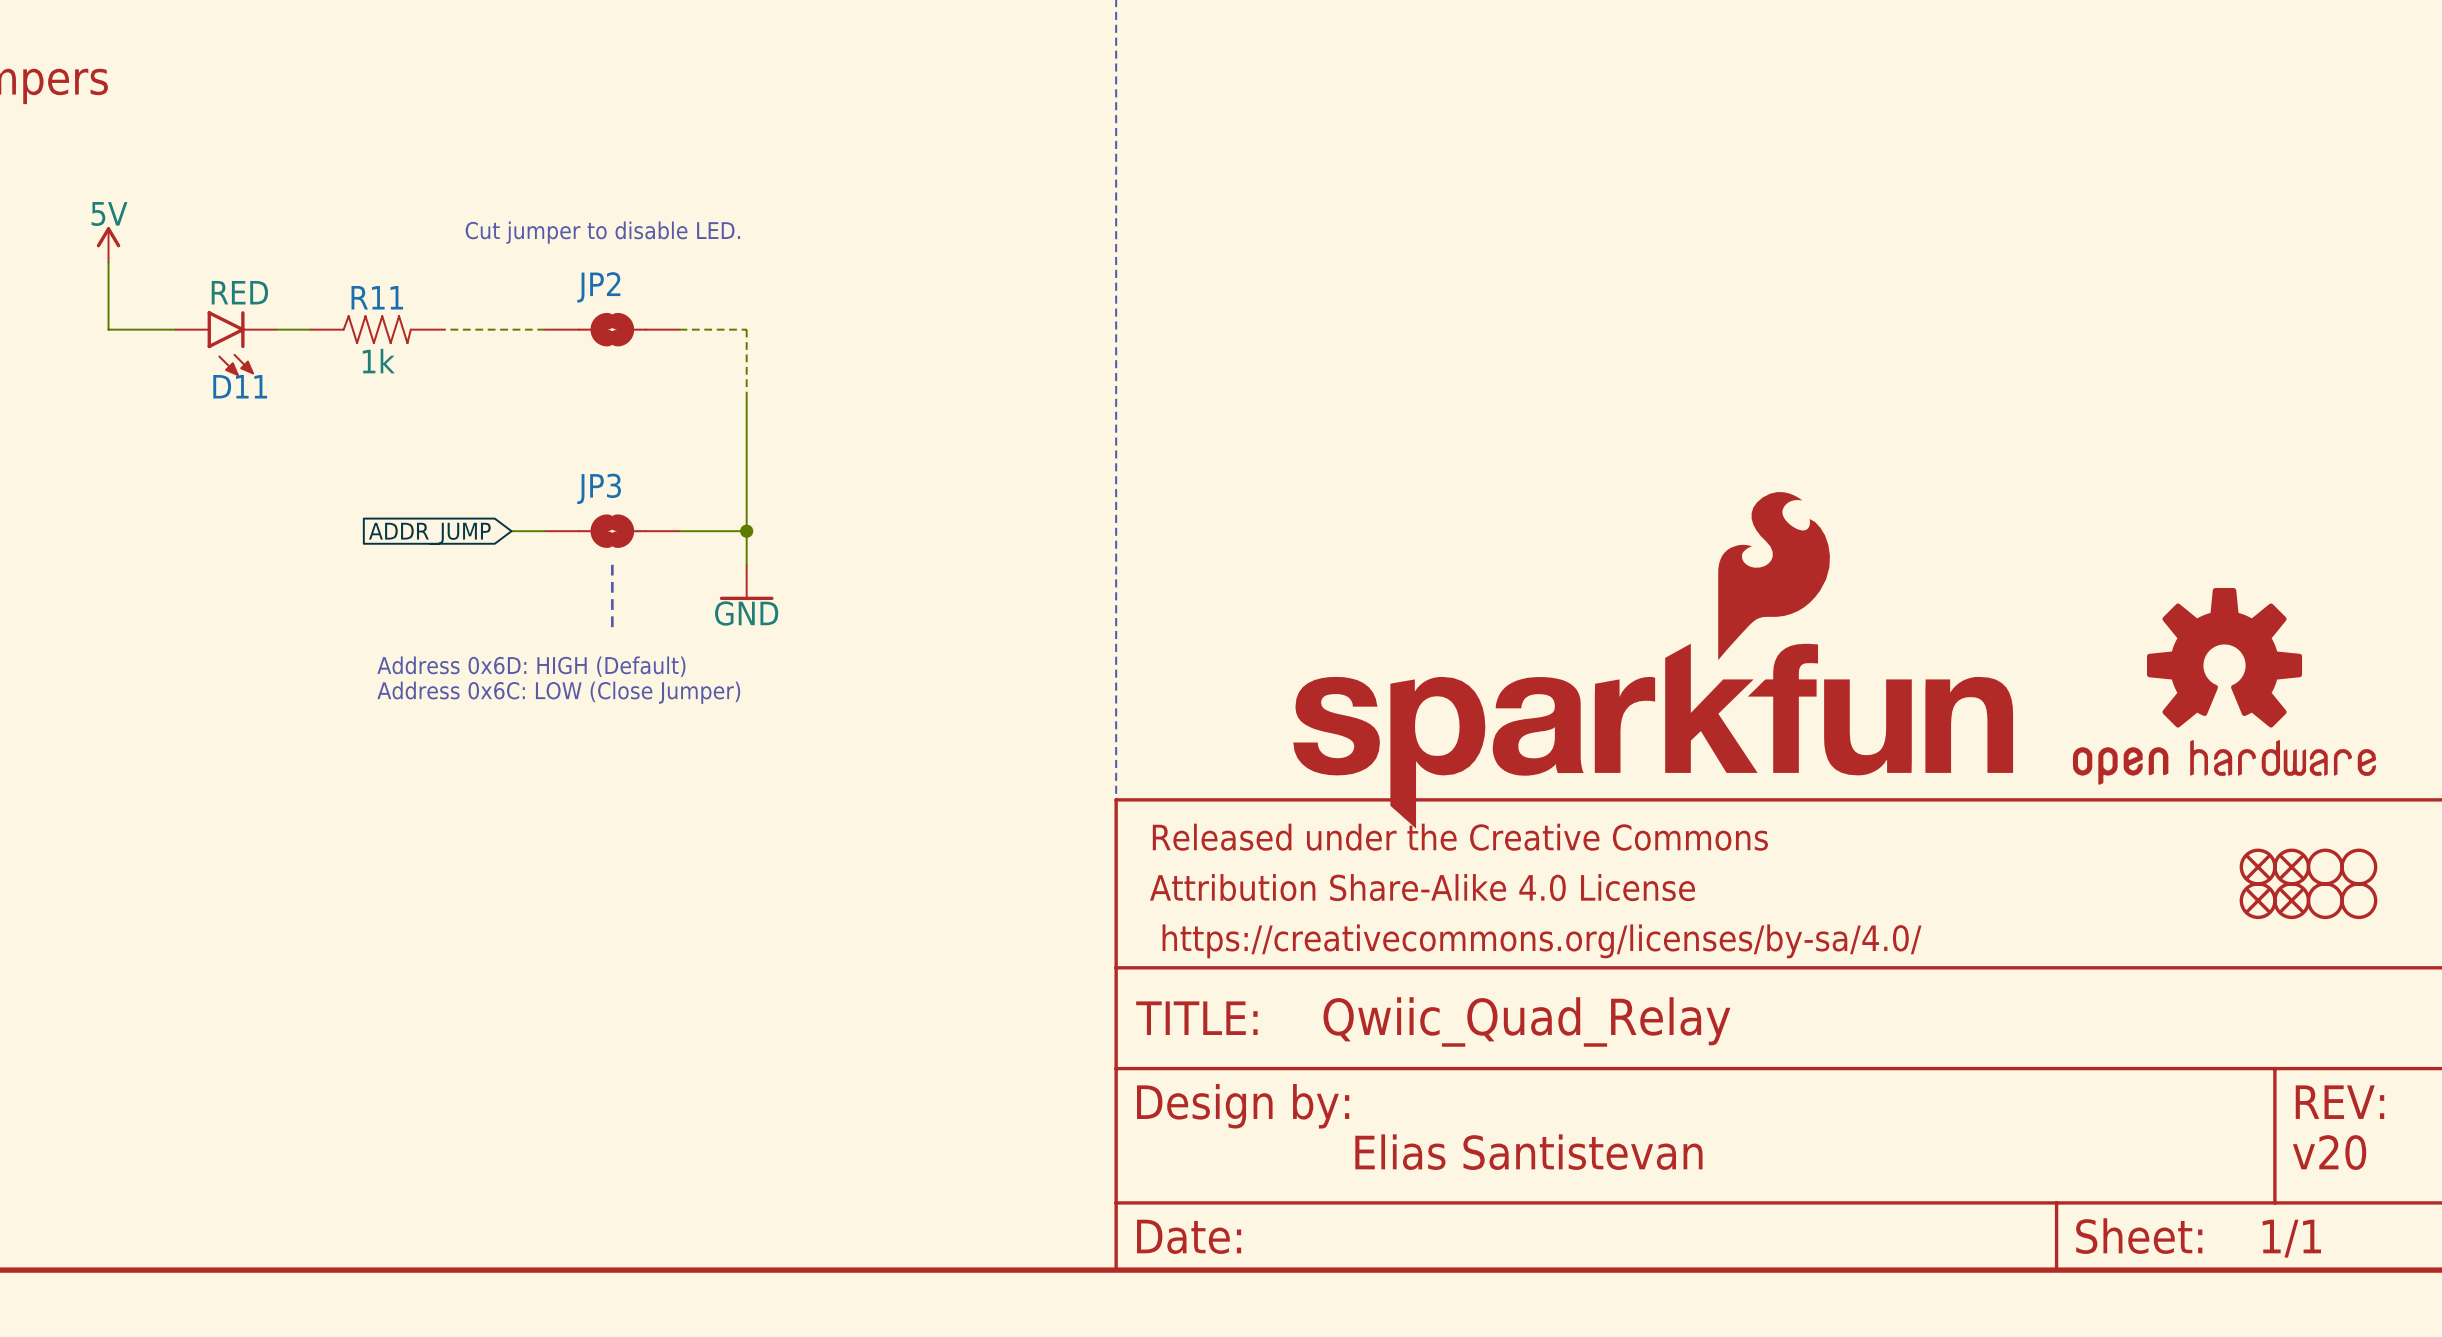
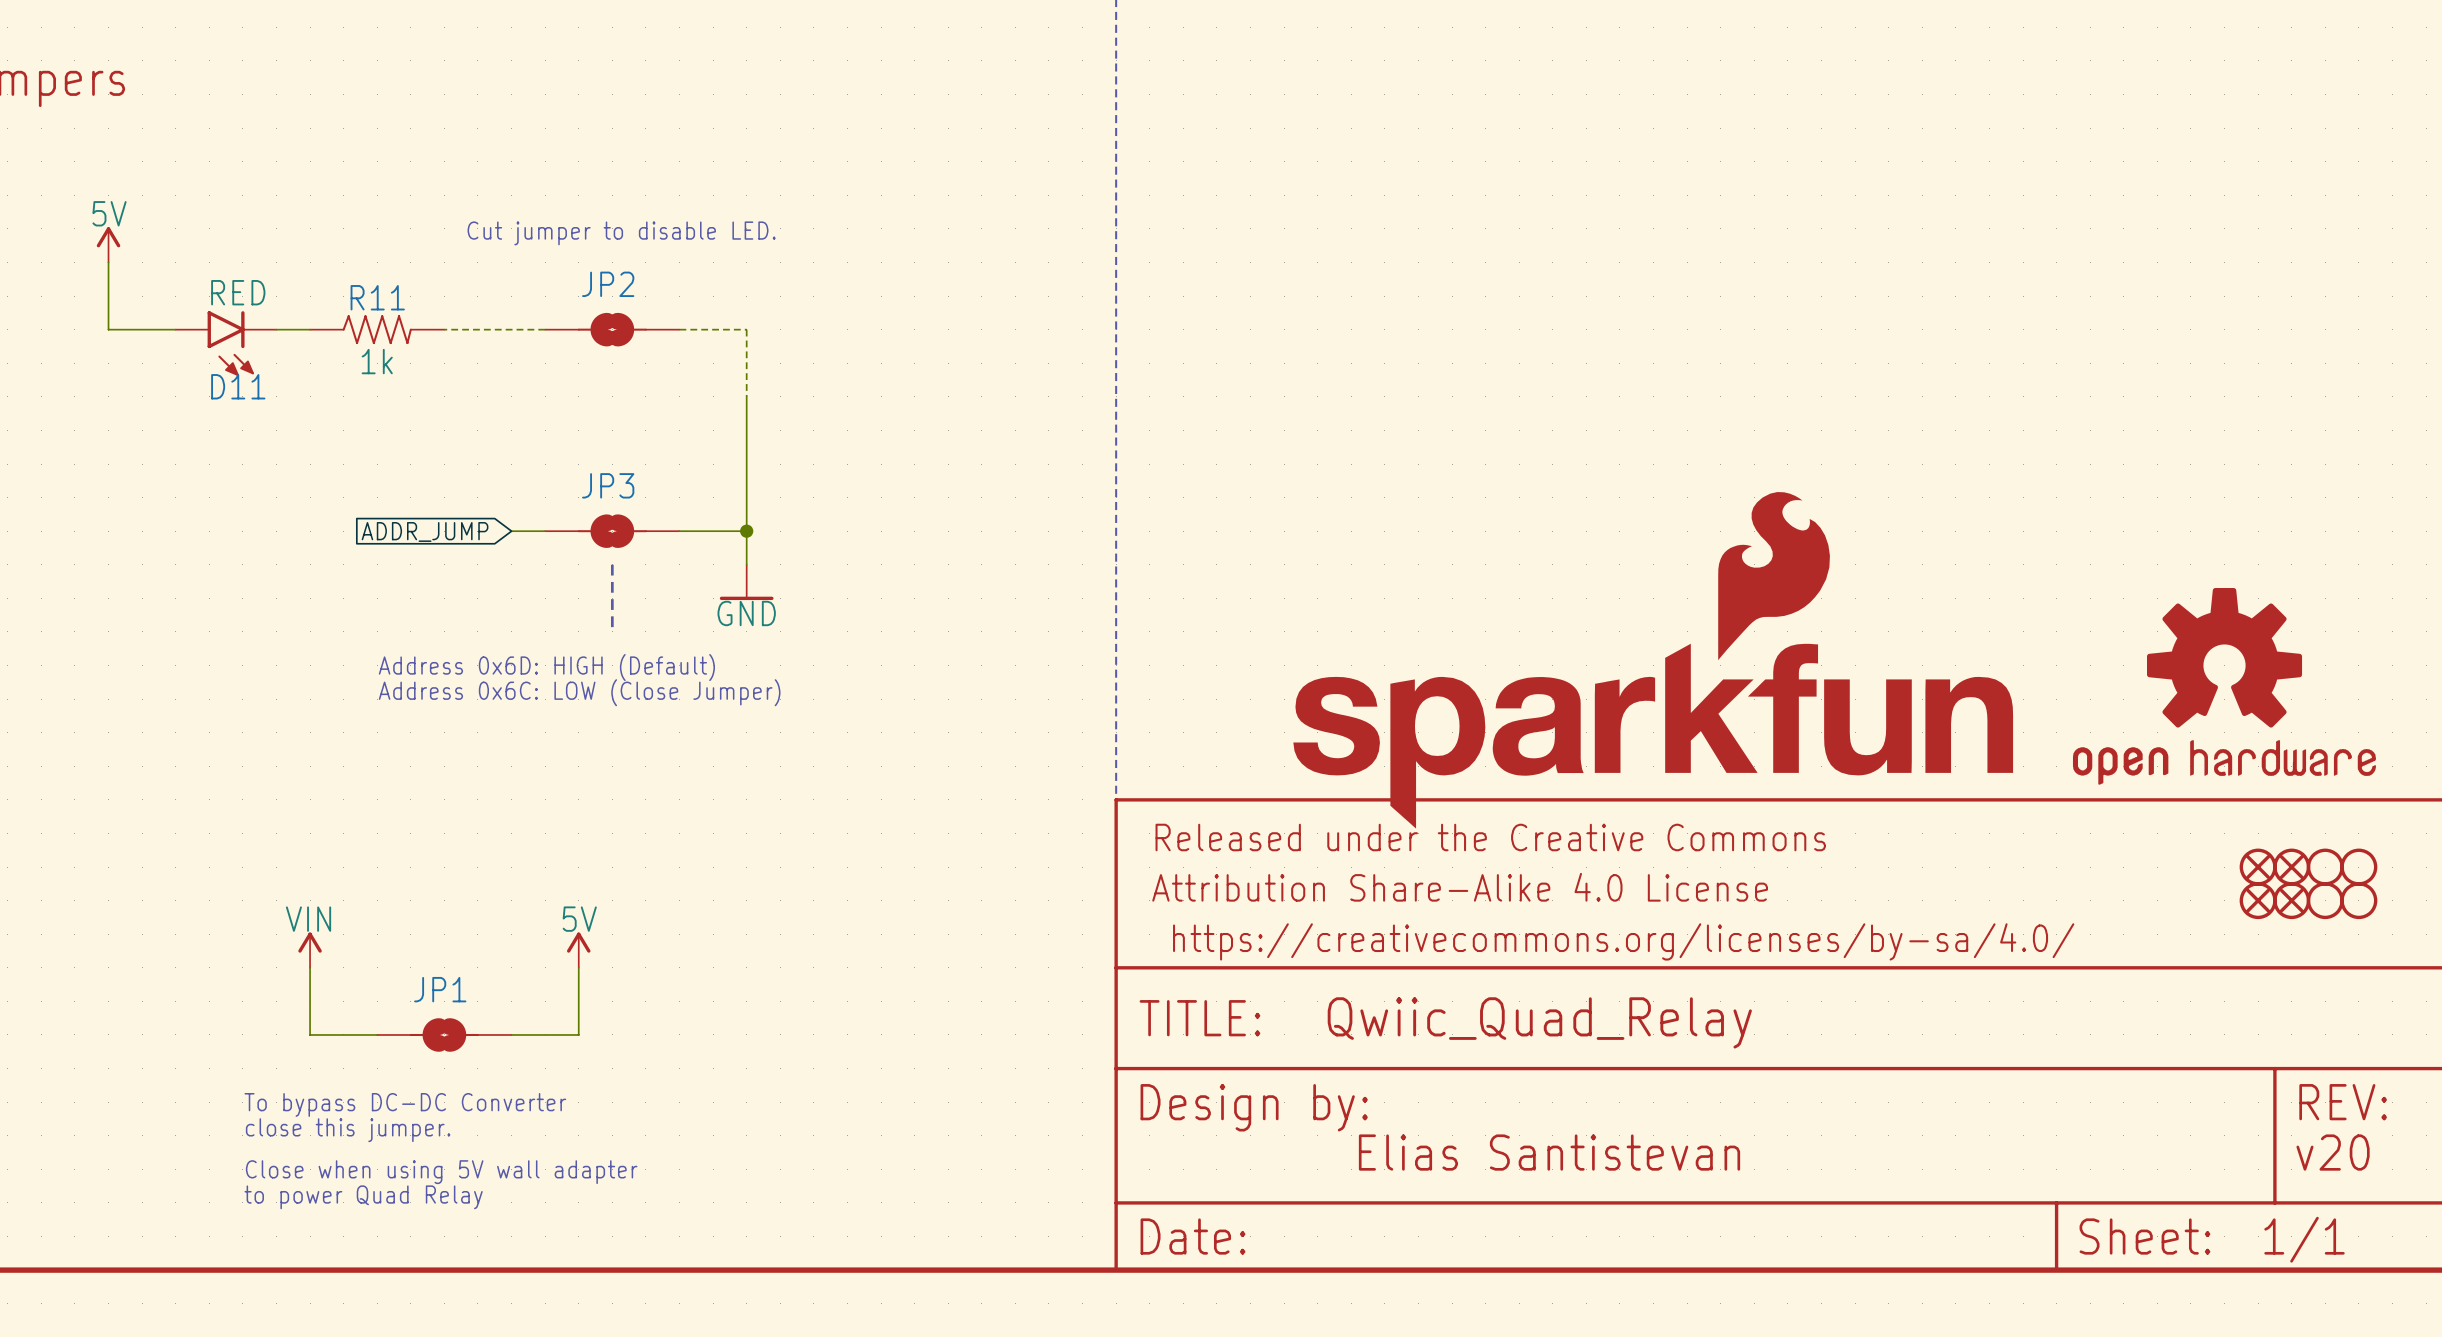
power symbol: none -> VIN (310, 950)
power symbol: none -> 5V (578, 950)
wire: none -> (310, 967) (310, 1034) (377, 1034)
wire: none -> (578, 967) (578, 1034) (511, 1034)
JP1: none -> (444, 1034)
text: none -> To bypass DC-DC Converter (405, 1104)
text: none -> close this jumper. (348, 1130)
text: none -> Close when using 5V wall adapter (441, 1172)
text: none -> to power Quad Relay (363, 1197)

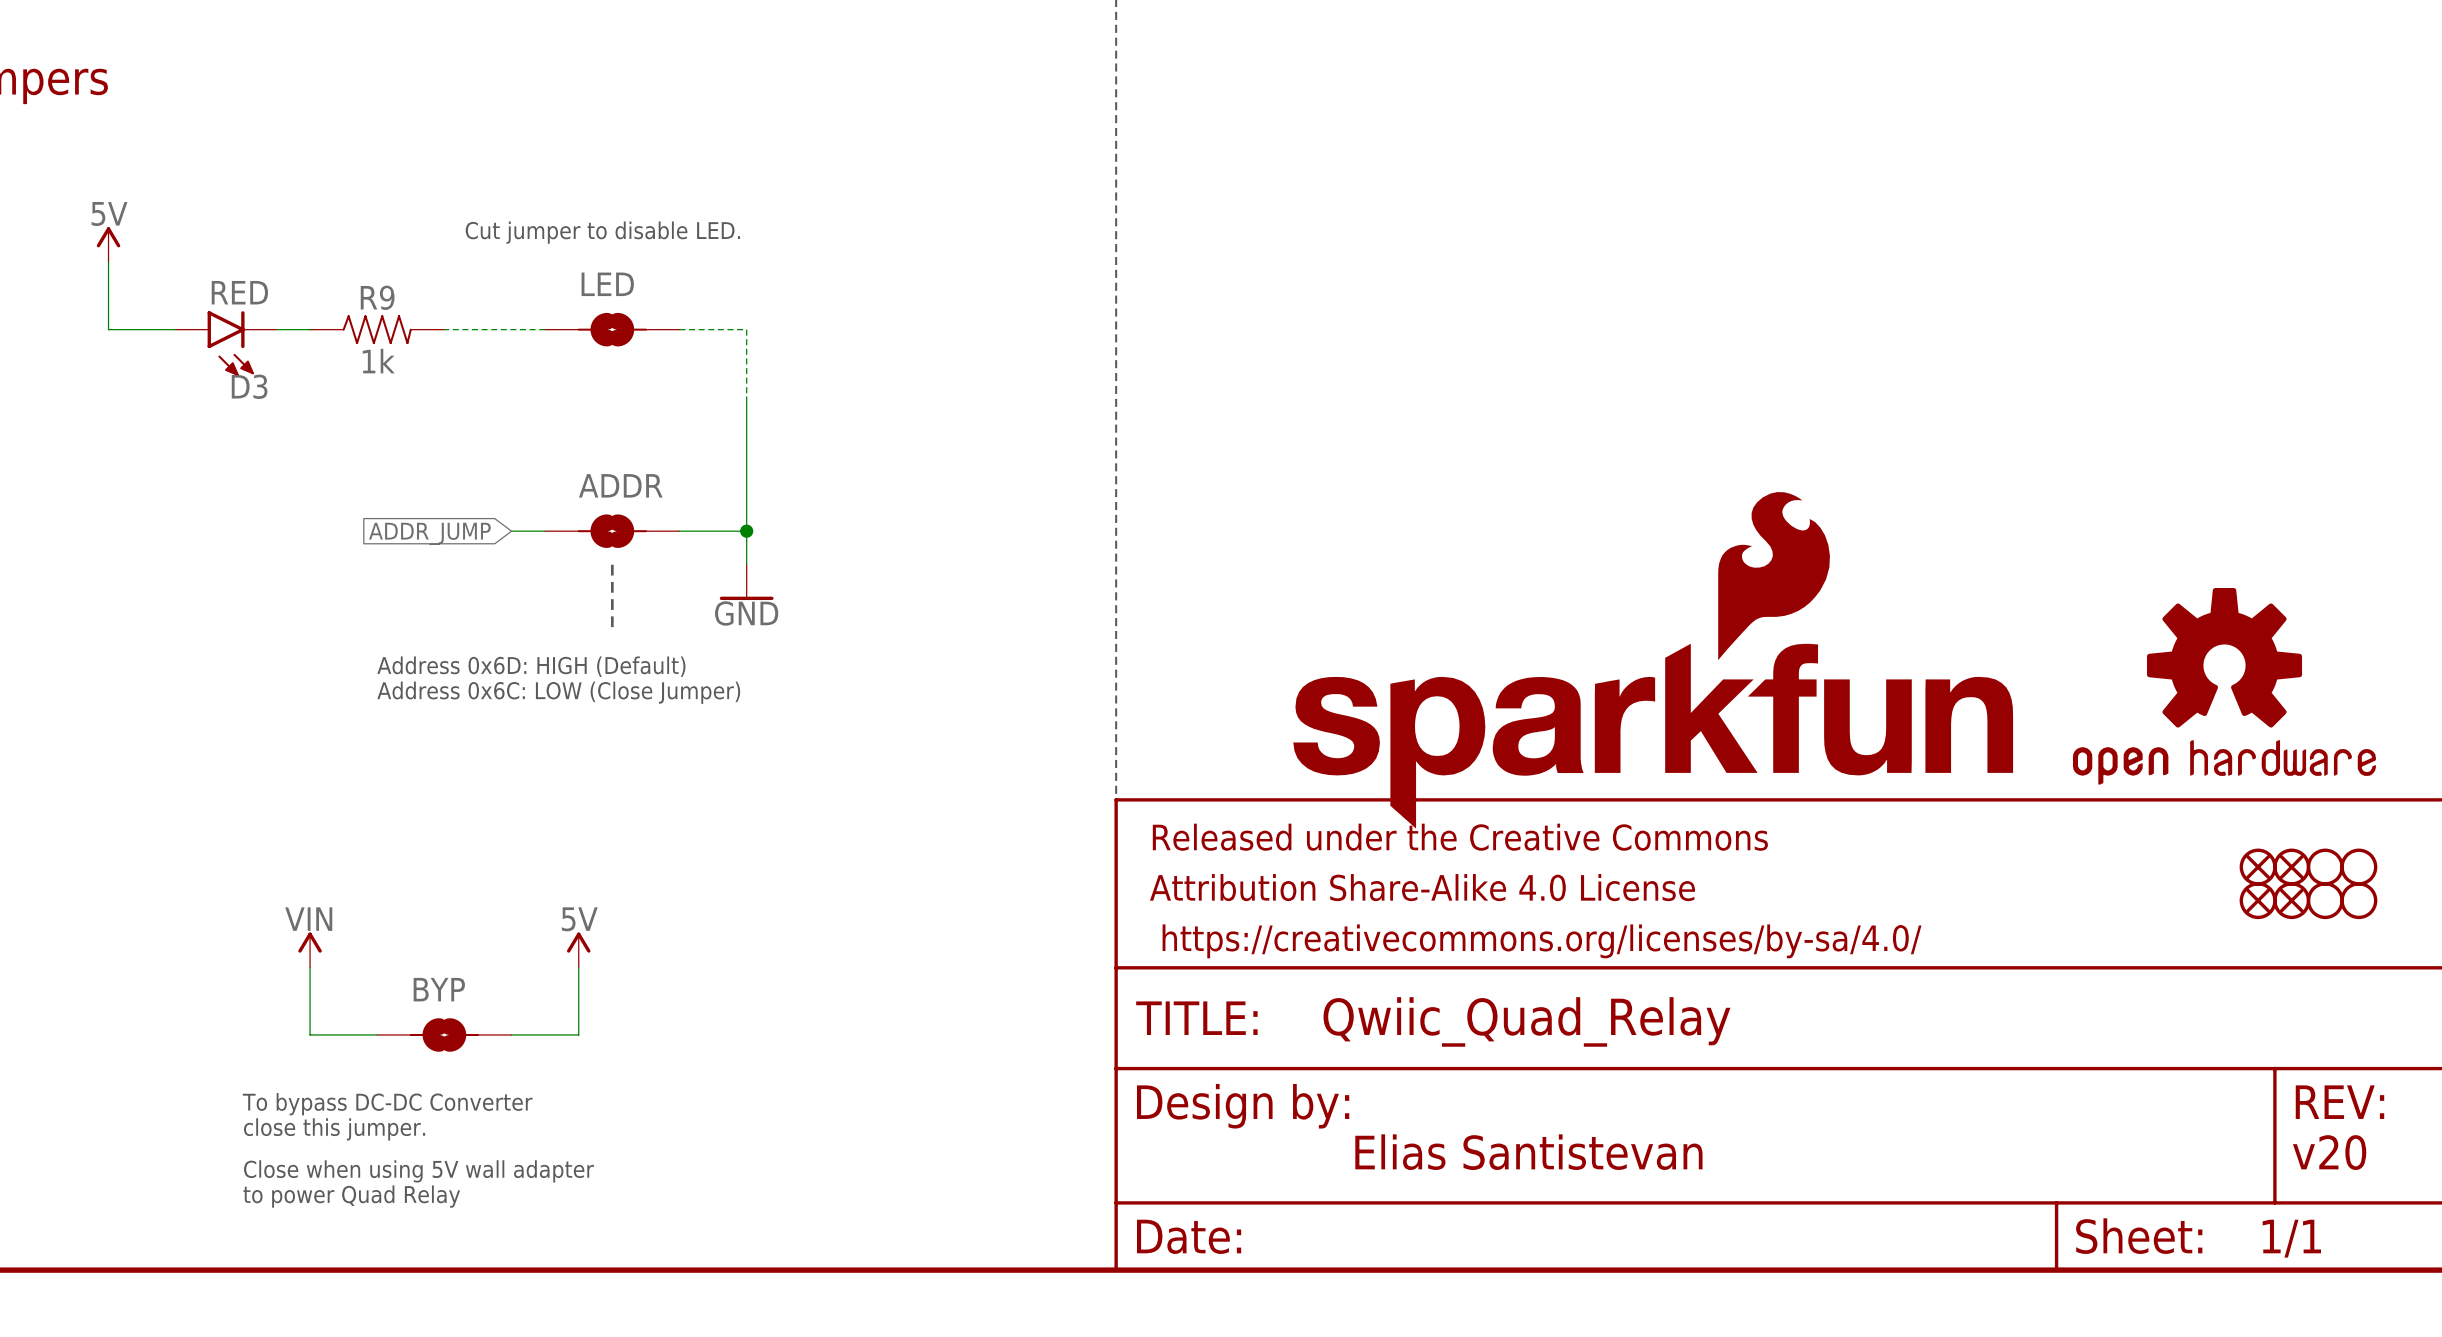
JP2 name: JP2 (608, 284) -> LED (607, 284)
R11 name: R11 (377, 297) -> R9 (377, 297)
D11 name: D11 (238, 386) -> D3 (249, 386)
JP3 name: JP3 (608, 485) -> ADDR (620, 485)
JP1 name: JP1 (440, 989) -> BYP (439, 989)

